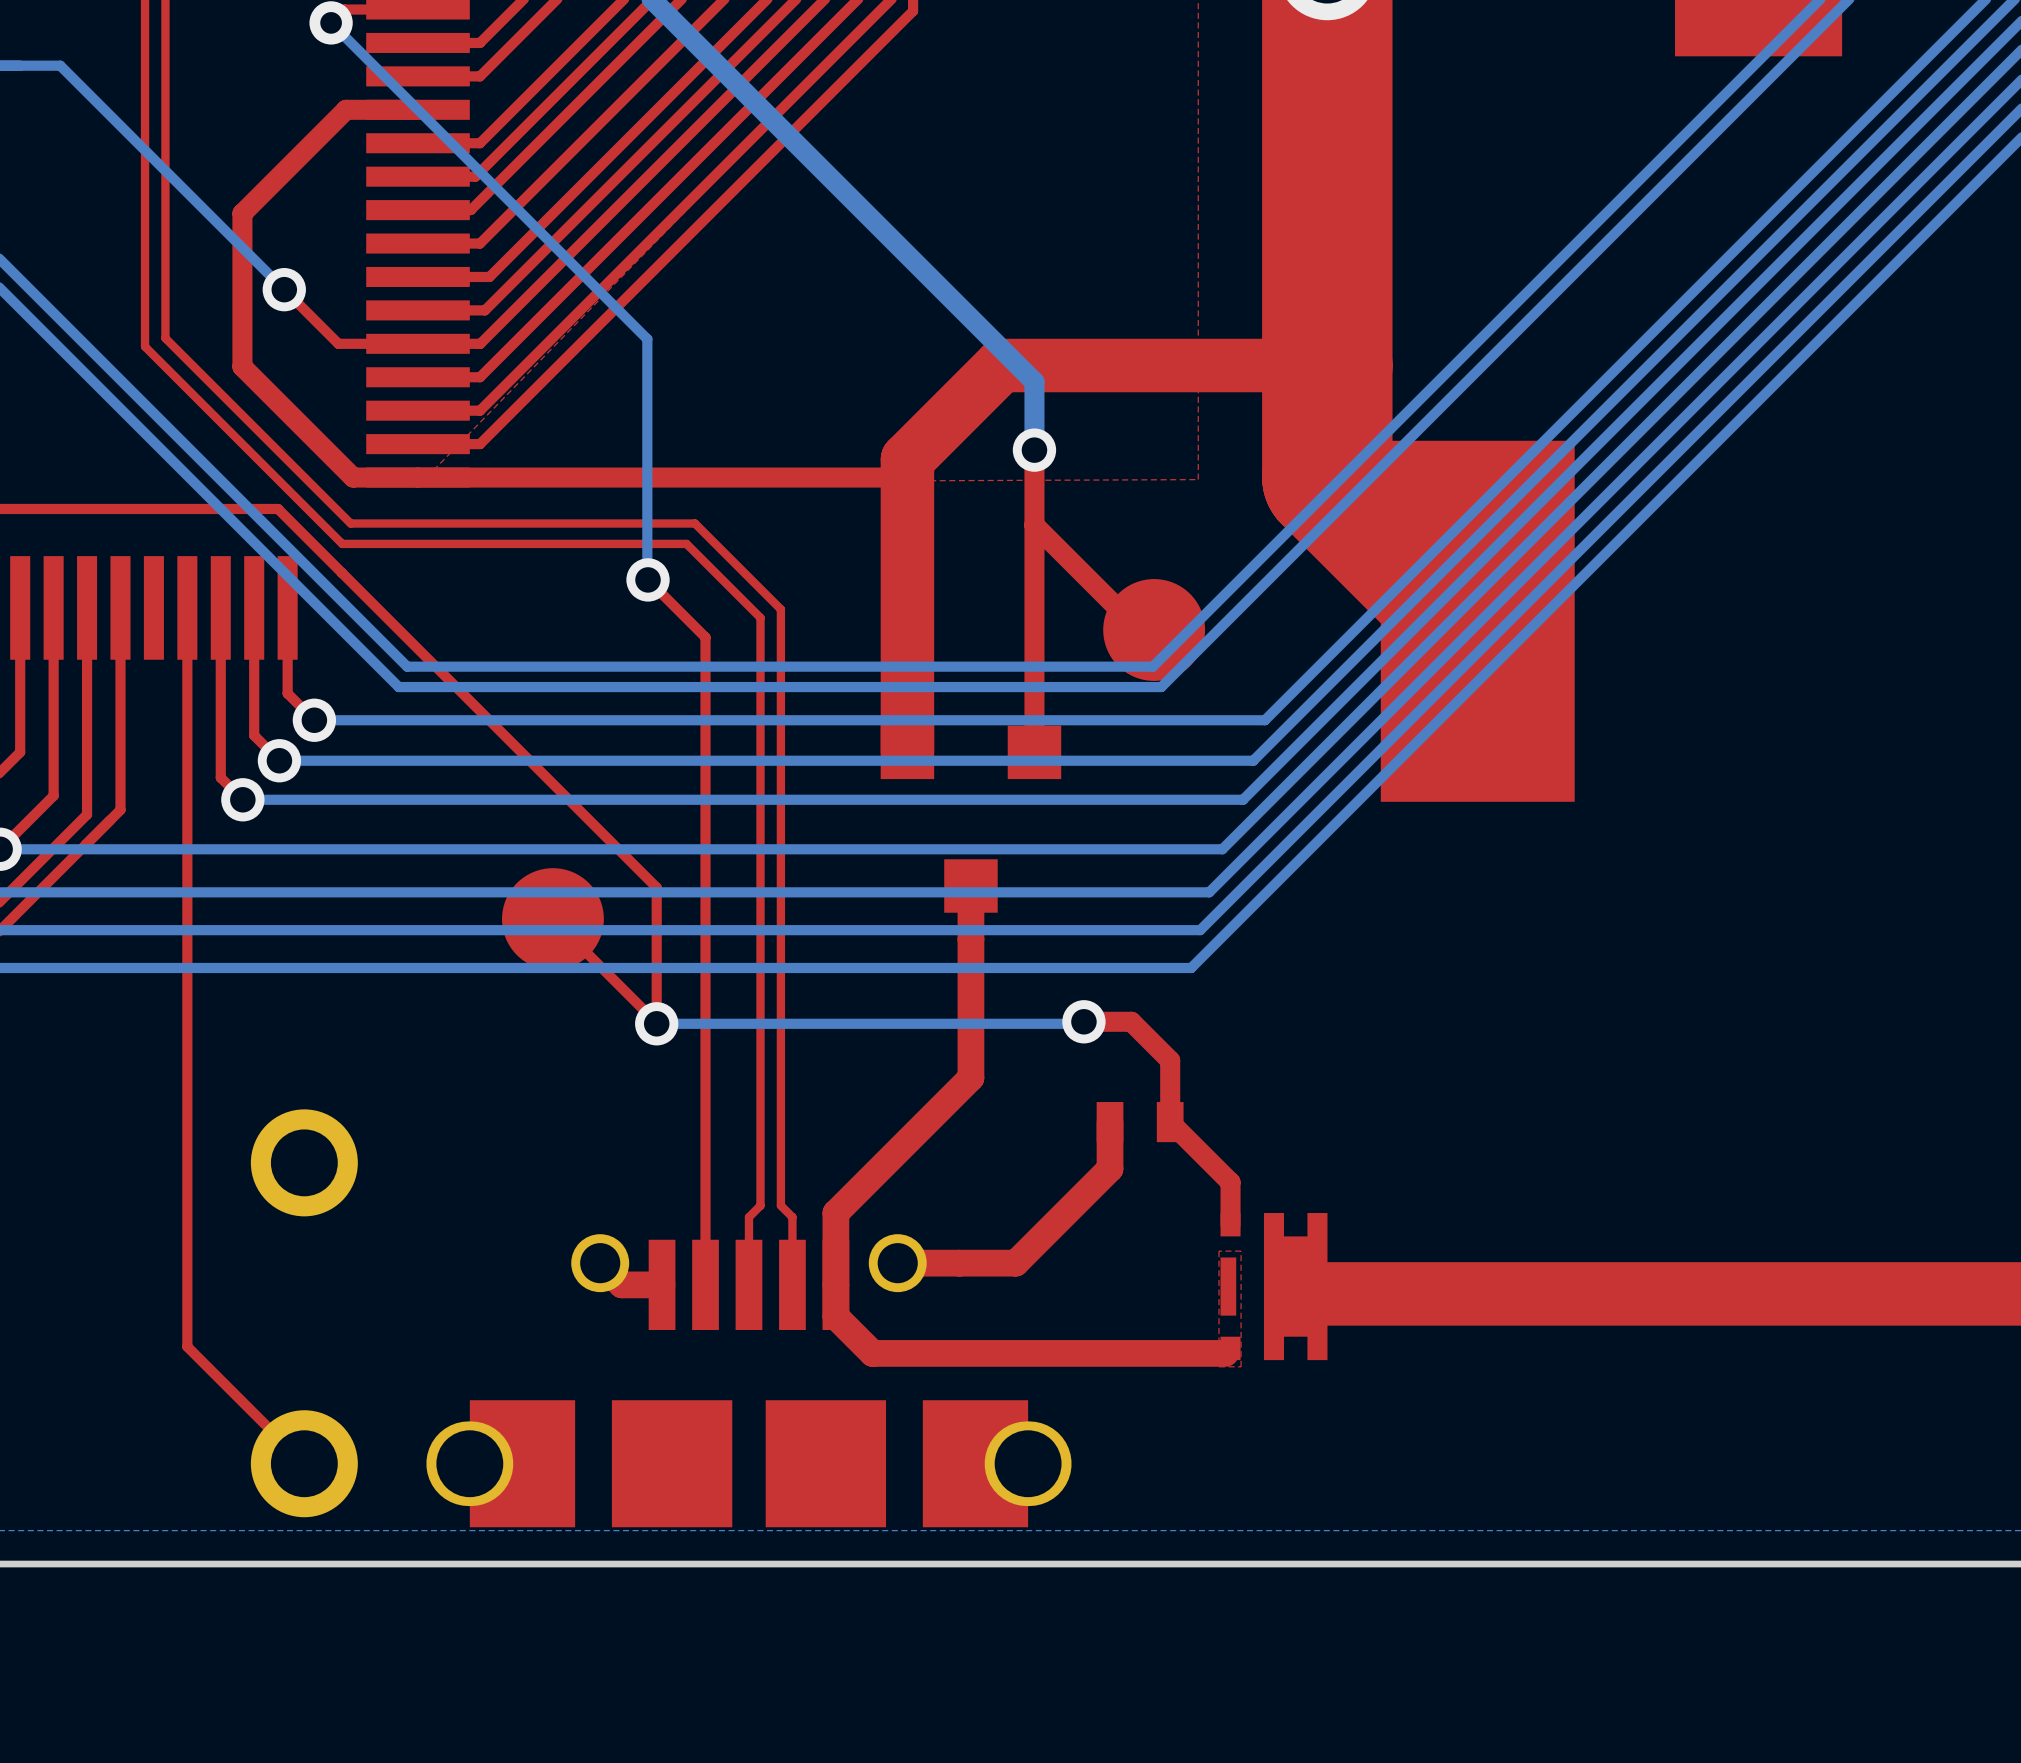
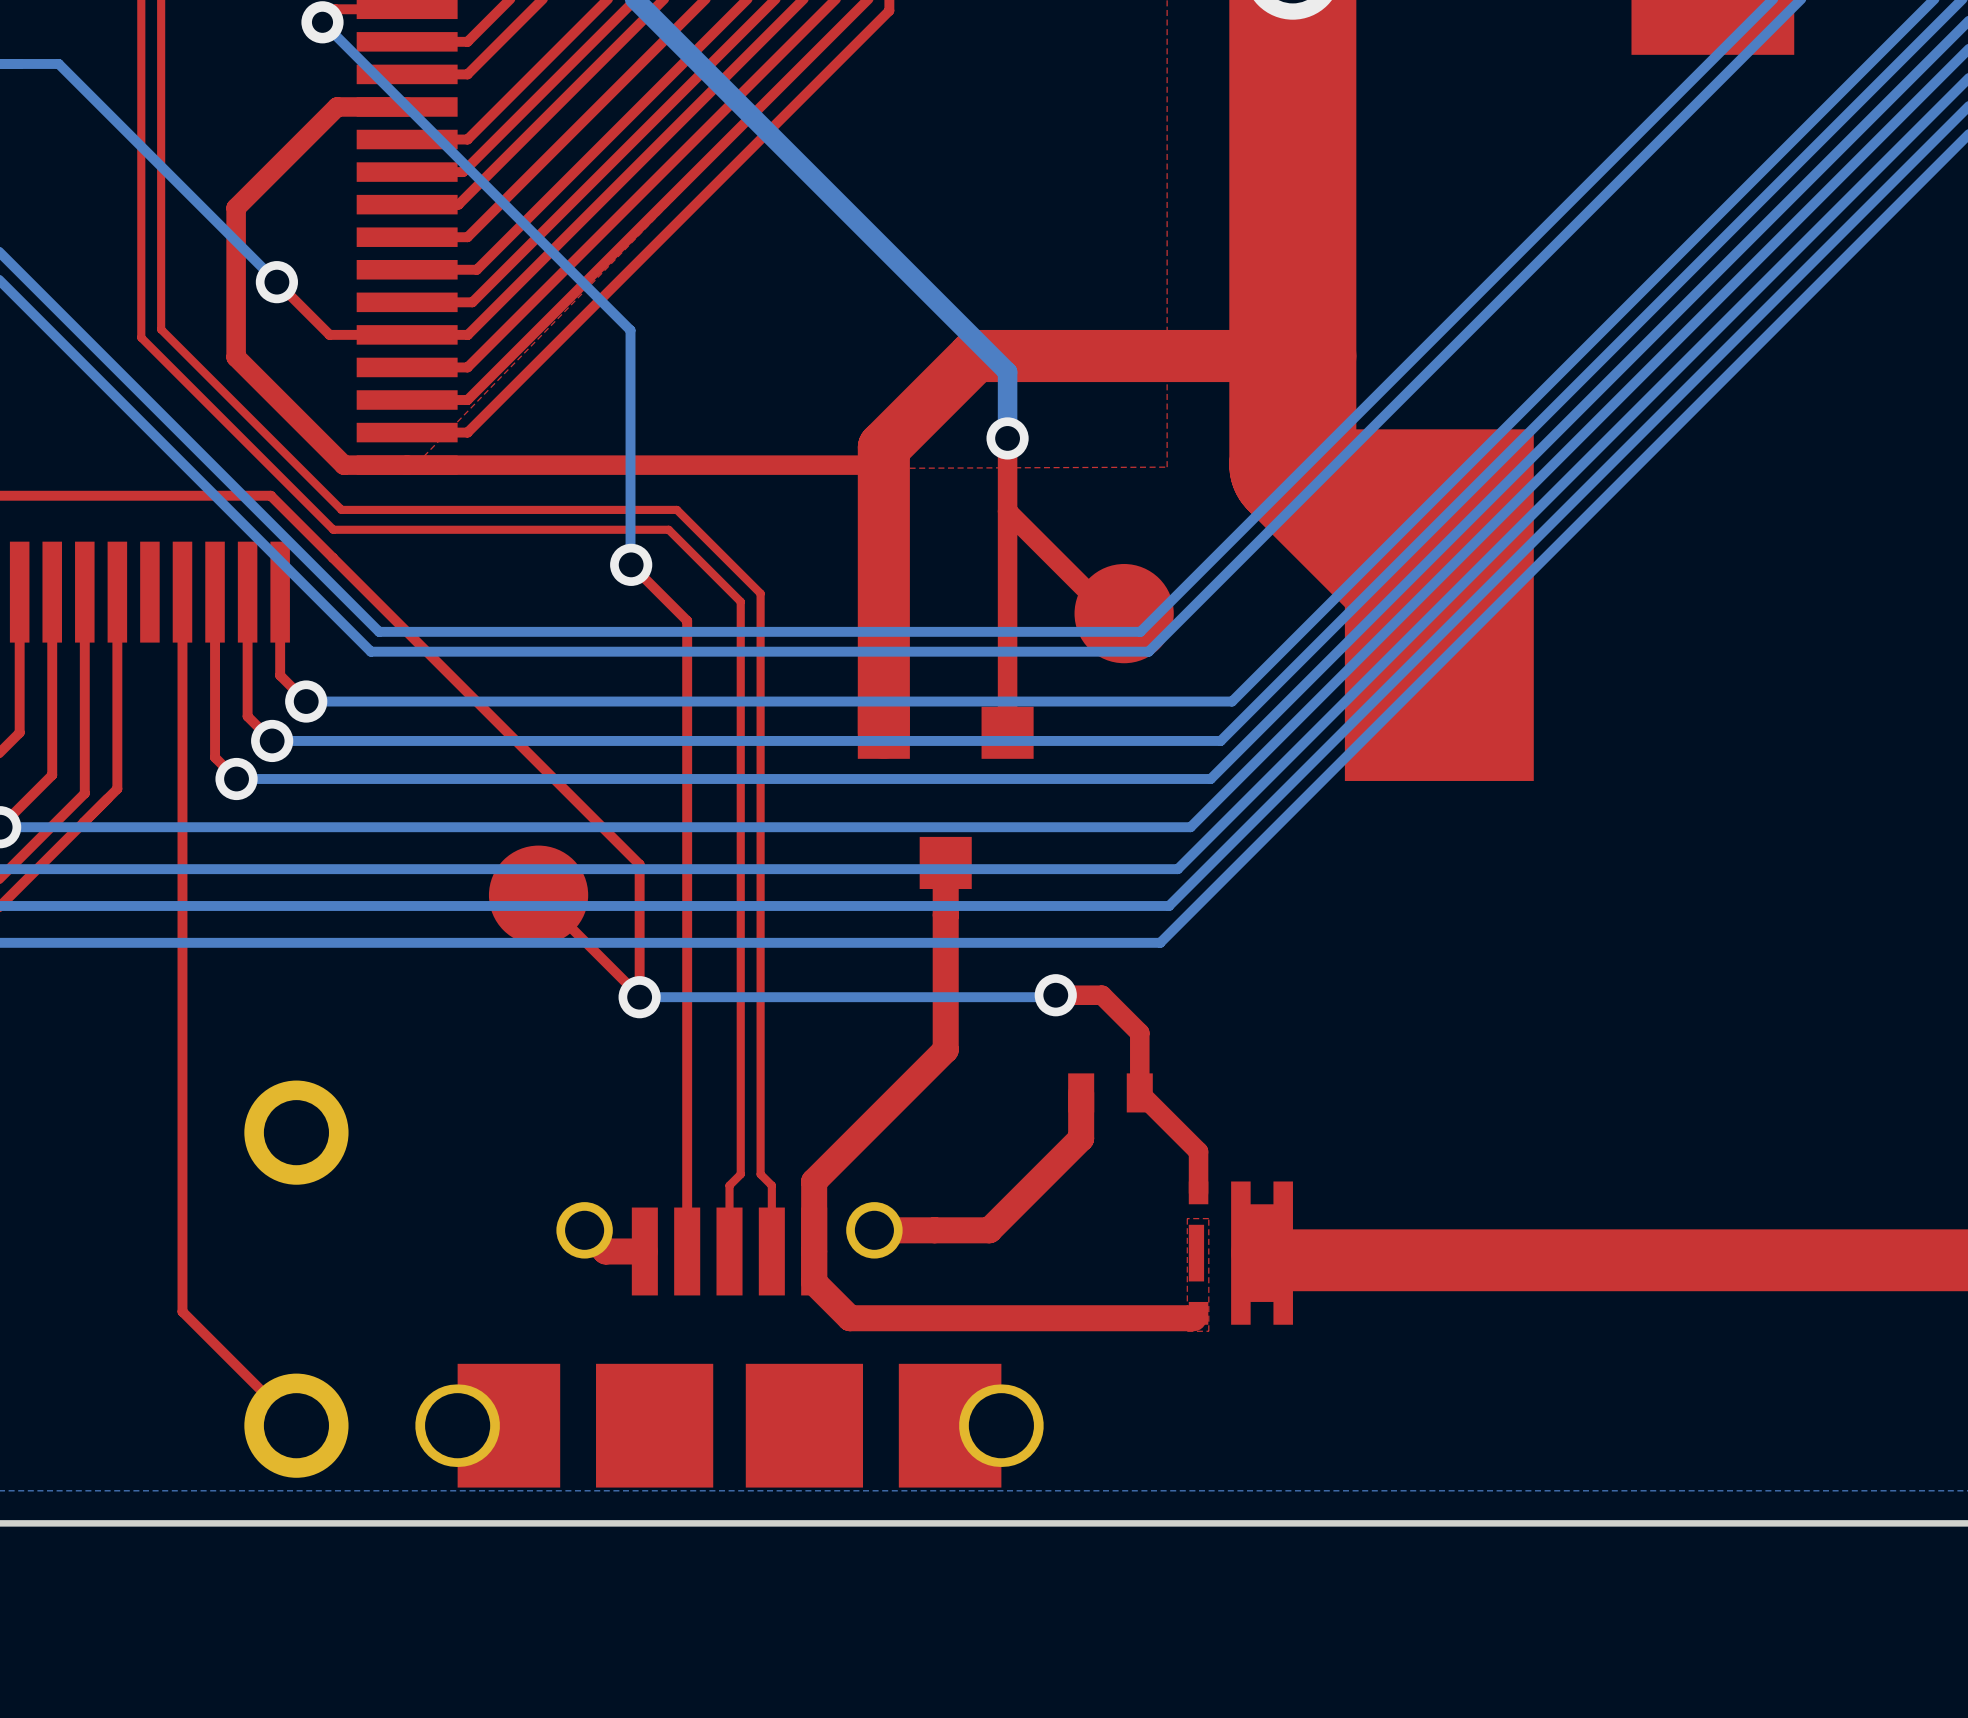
bottom track: (1170, 648) (1152, 666) (407, 666) (389, 648) -> (1140, 631) (379, 631)
bottom track: (1179, 669) (1161, 687) (398, 687) (380, 669) -> (1148, 651) (370, 651)

